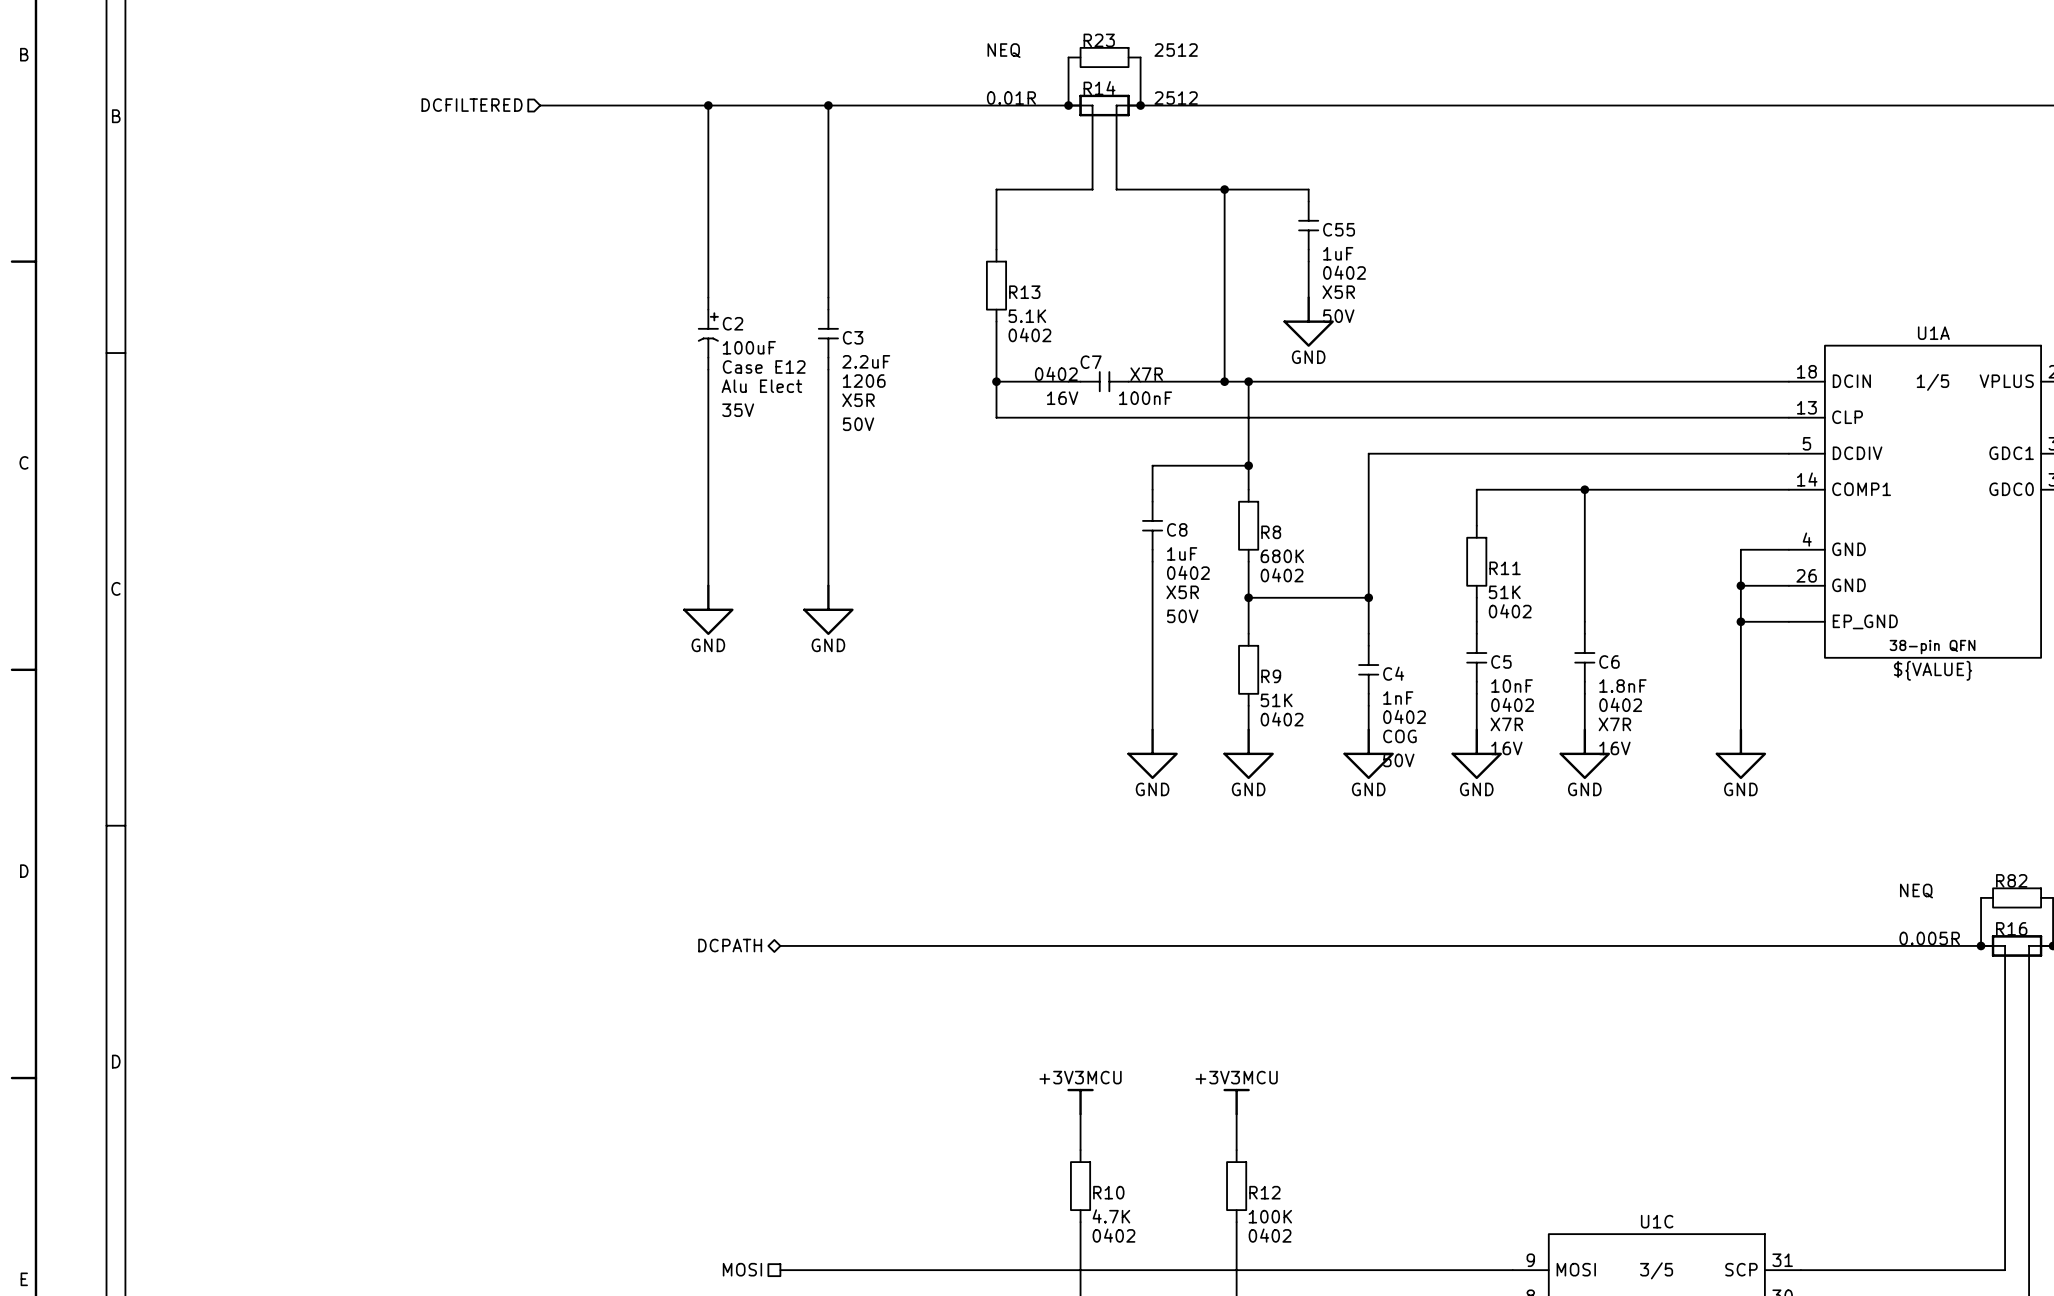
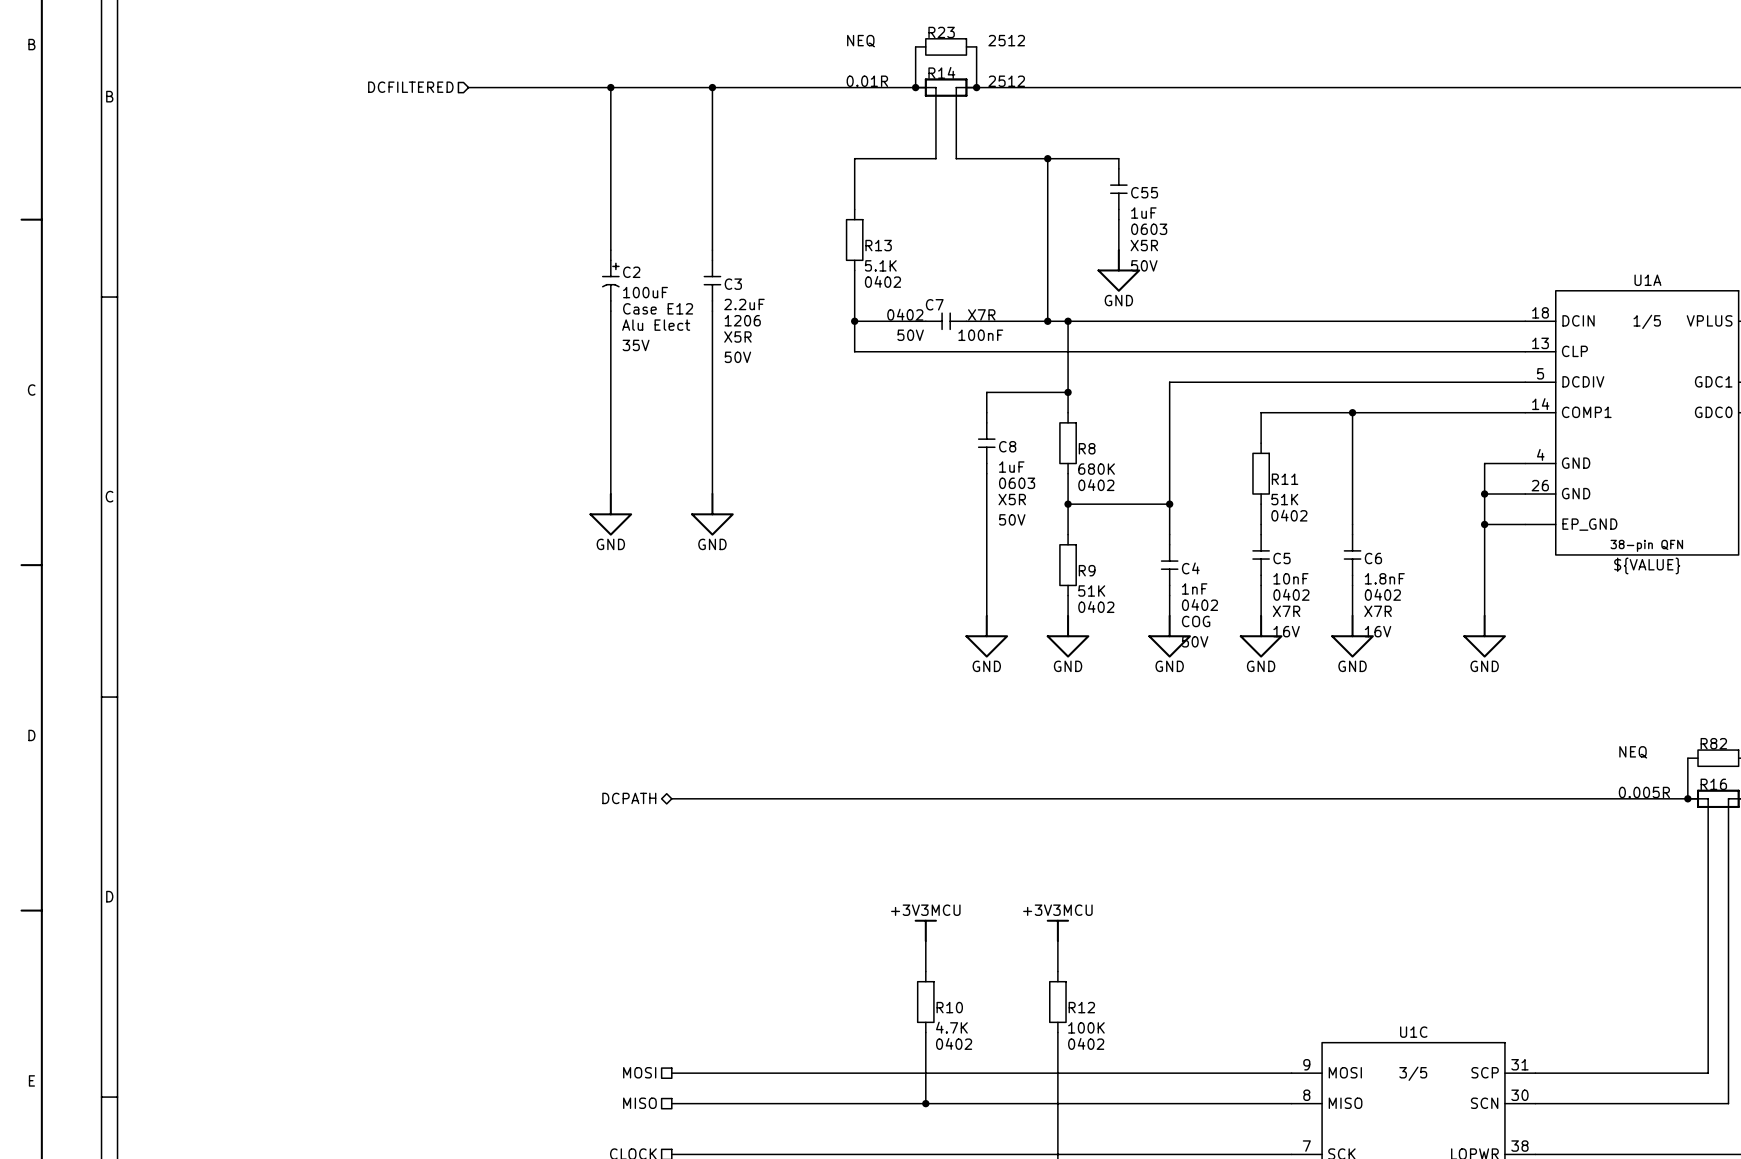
C55 text: 0402 (1344, 272) -> 0603 (1149, 229)
C7 text: 16V (1062, 398) -> 50V (910, 335)
C8 text: 0402 (1188, 572) -> 0603 (1017, 483)

